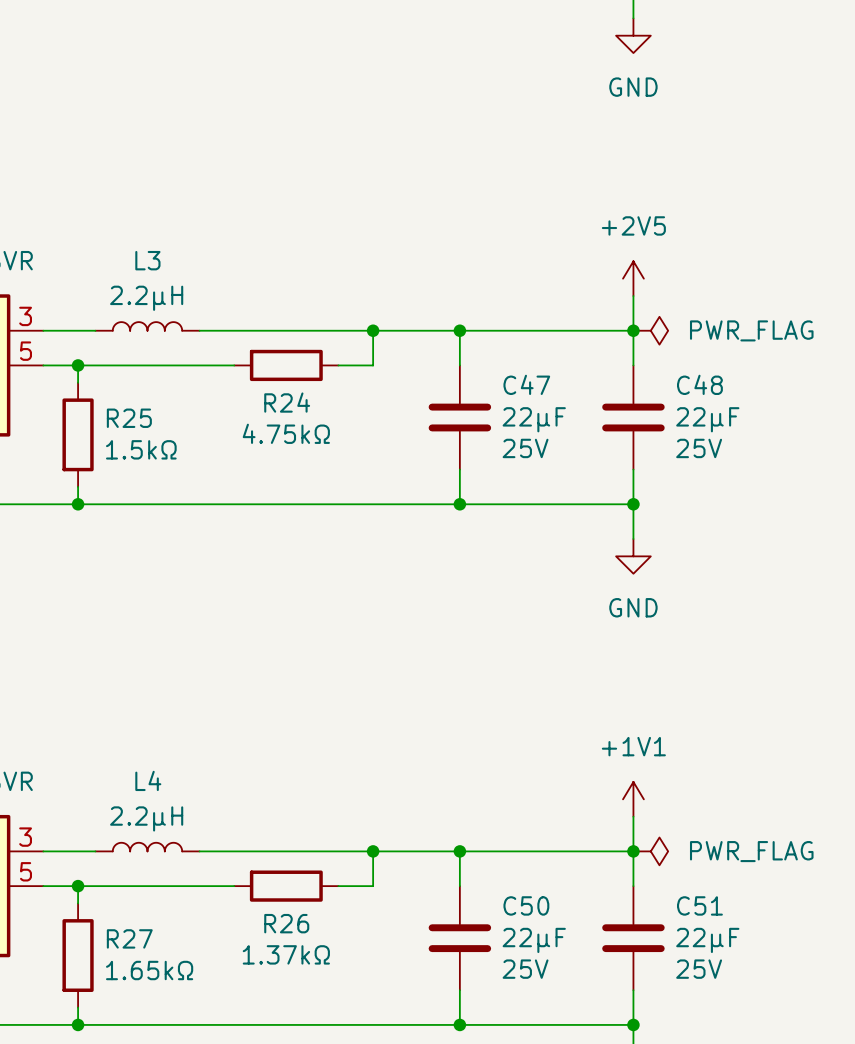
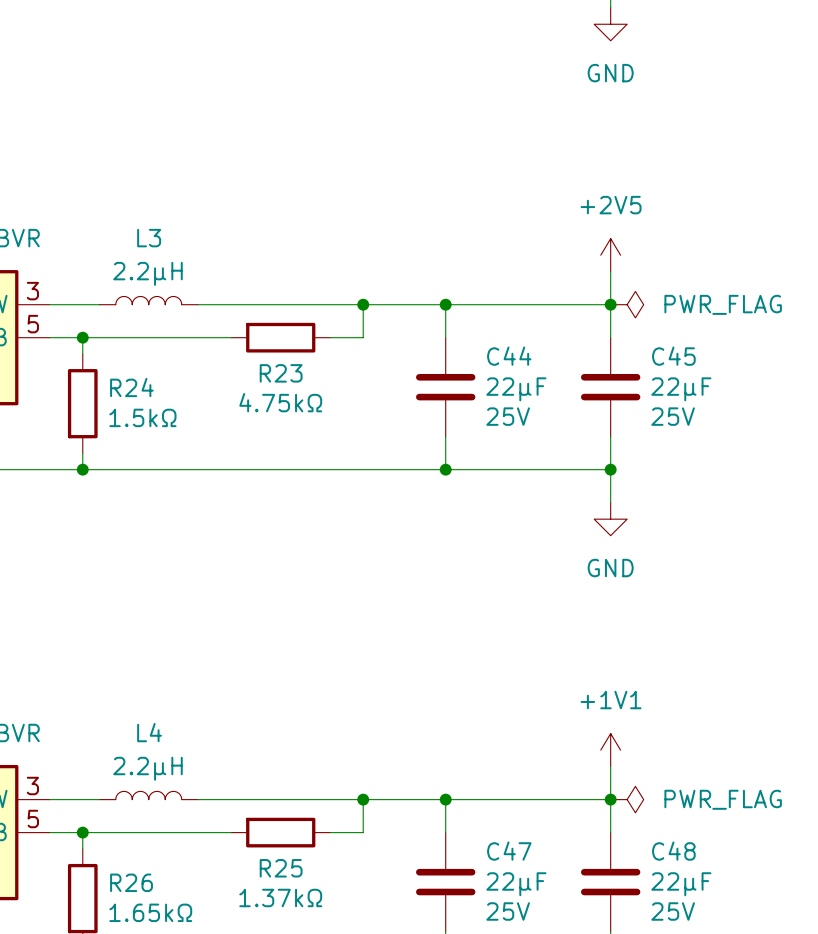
C47 name: C47 (526, 384) -> C44 (509, 356)
C48 name: C48 (699, 384) -> C45 (673, 356)
R24 name: R24 (287, 402) -> R23 (281, 373)
R25 name: R25 (129, 418) -> R24 (131, 387)
C50 name: C50 (526, 905) -> C47 (509, 851)
C51 name: C51 (699, 905) -> C48 (673, 851)
R26 name: R26 (286, 923) -> R25 (281, 868)
R27 name: R27 (129, 938) -> R26 (131, 882)

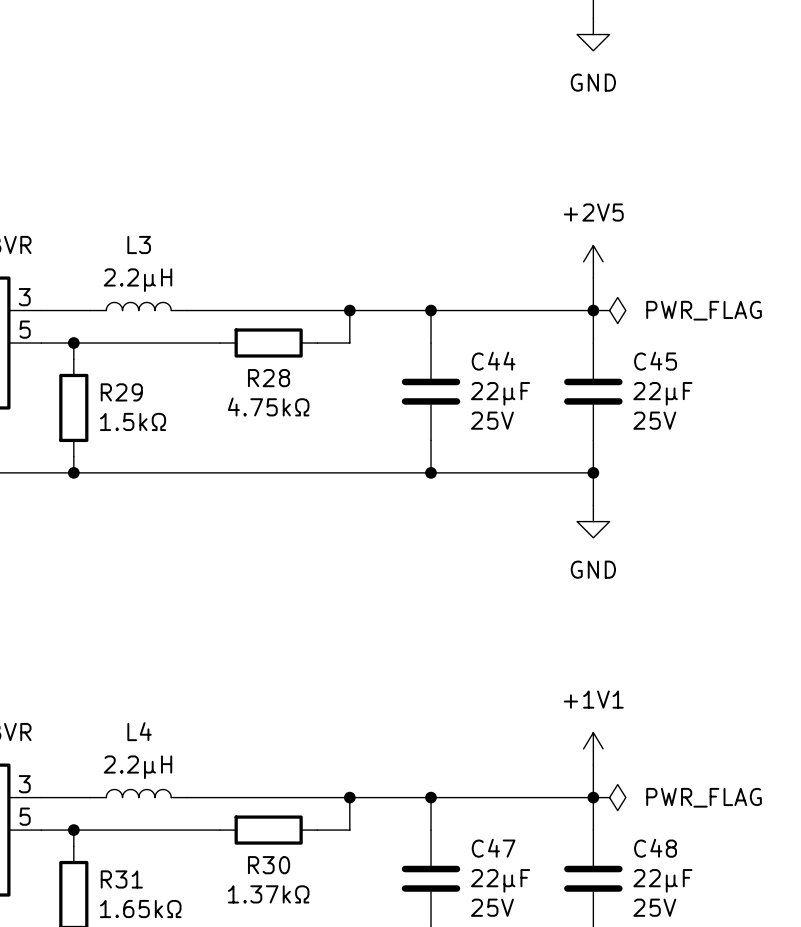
R23 name: R23 (281, 373) -> R28 (269, 378)
R24 name: R24 (131, 387) -> R29 (121, 392)
R25 name: R25 (281, 868) -> R30 (269, 865)
R26 name: R26 (131, 882) -> R31 (121, 879)

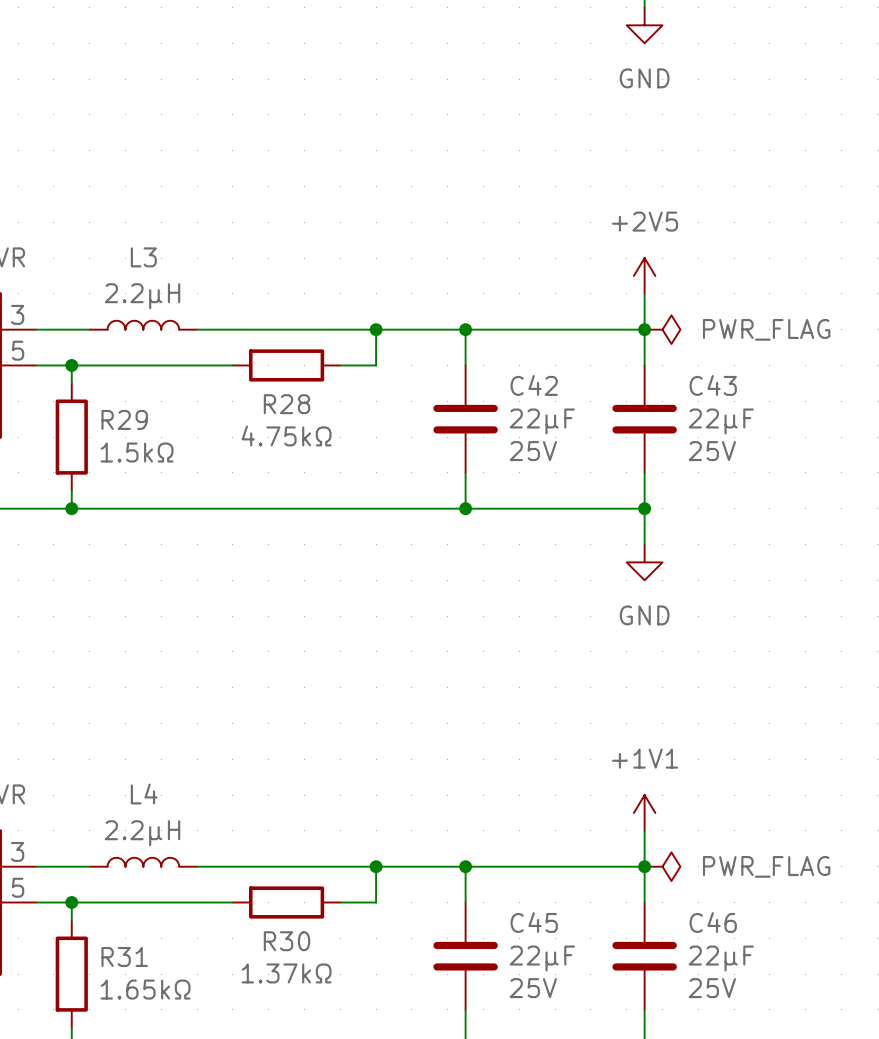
C44 name: C44 (493, 361) -> C42 (534, 385)
C45 name: C45 (655, 361) -> C43 (713, 385)
C47 name: C47 (493, 848) -> C45 (534, 922)
C48 name: C48 (655, 848) -> C46 (713, 922)

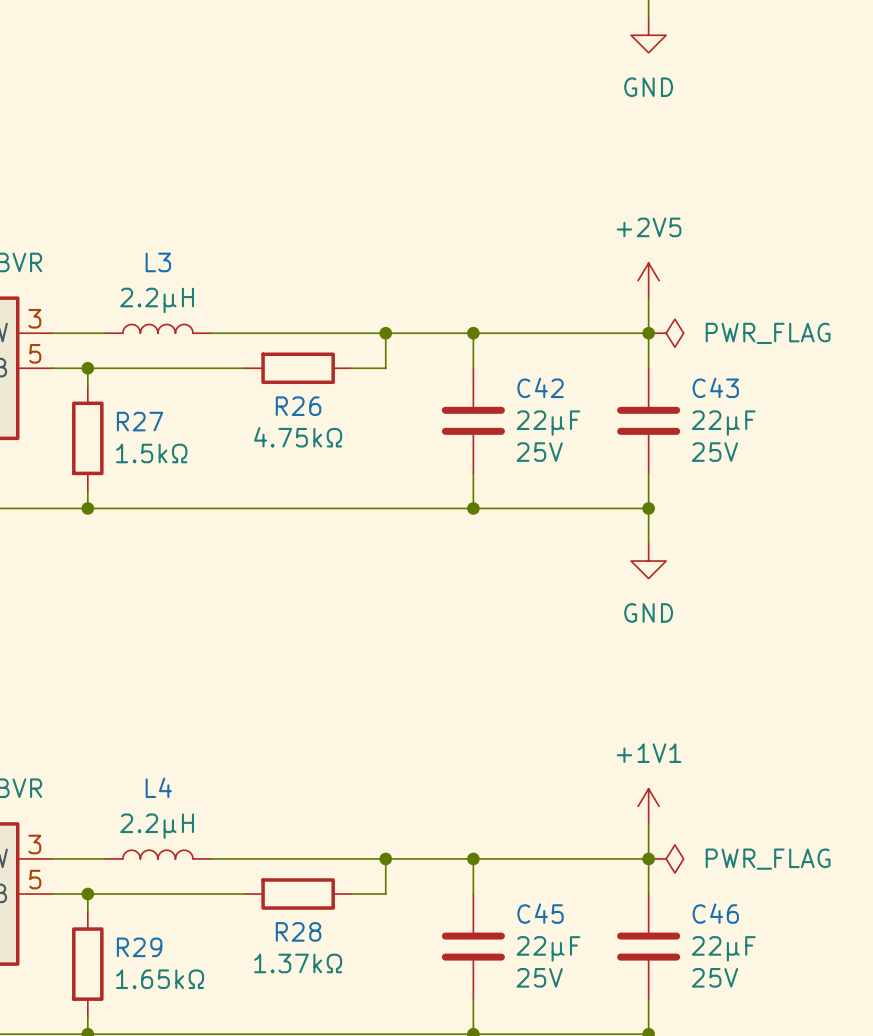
R28 name: R28 (287, 404) -> R26 (298, 406)
R29 name: R29 (124, 419) -> R27 (140, 421)
R30 name: R30 (287, 941) -> R28 (298, 931)
R31 name: R31 (124, 956) -> R29 (139, 947)

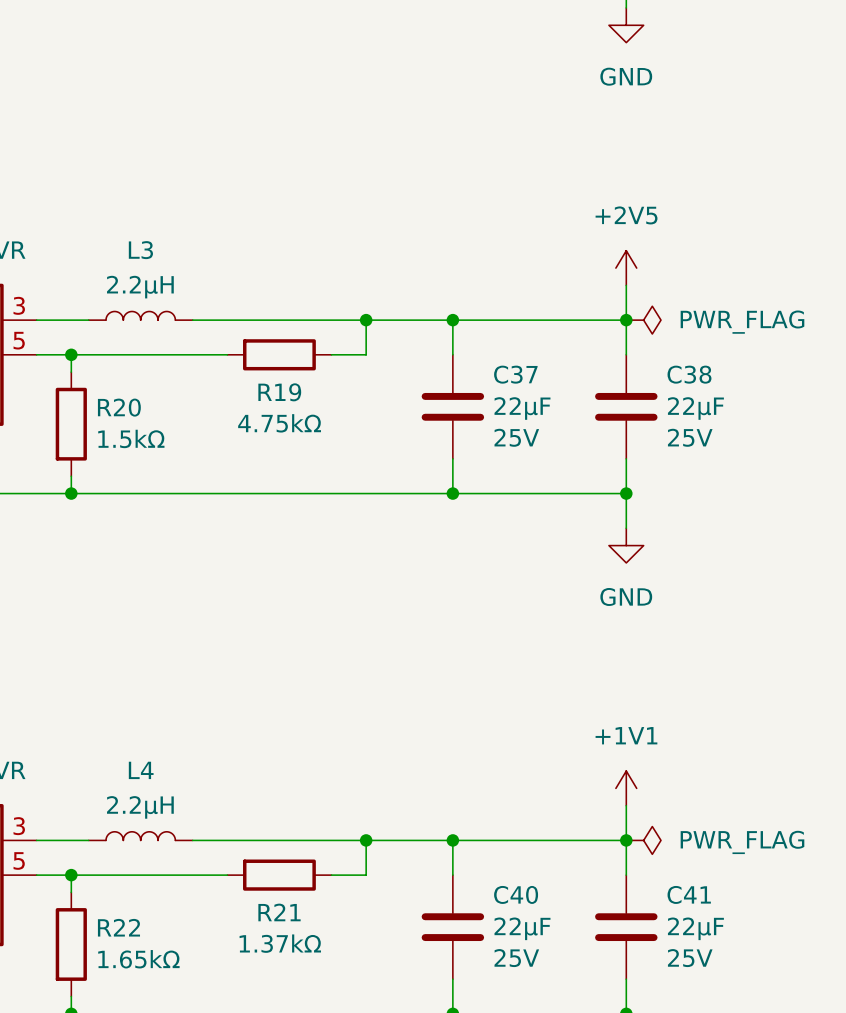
C42 name: C42 (540, 387) -> C37 (515, 374)
C43 name: C43 (715, 387) -> C38 (689, 374)
R26 name: R26 (298, 406) -> R19 (279, 392)
R27 name: R27 (140, 421) -> R20 (119, 407)
C45 name: C45 (540, 913) -> C40 (516, 894)
C46 name: C46 (715, 913) -> C41 (689, 894)
R28 name: R28 (298, 931) -> R21 (279, 912)
R29 name: R29 (139, 947) -> R22 (118, 927)

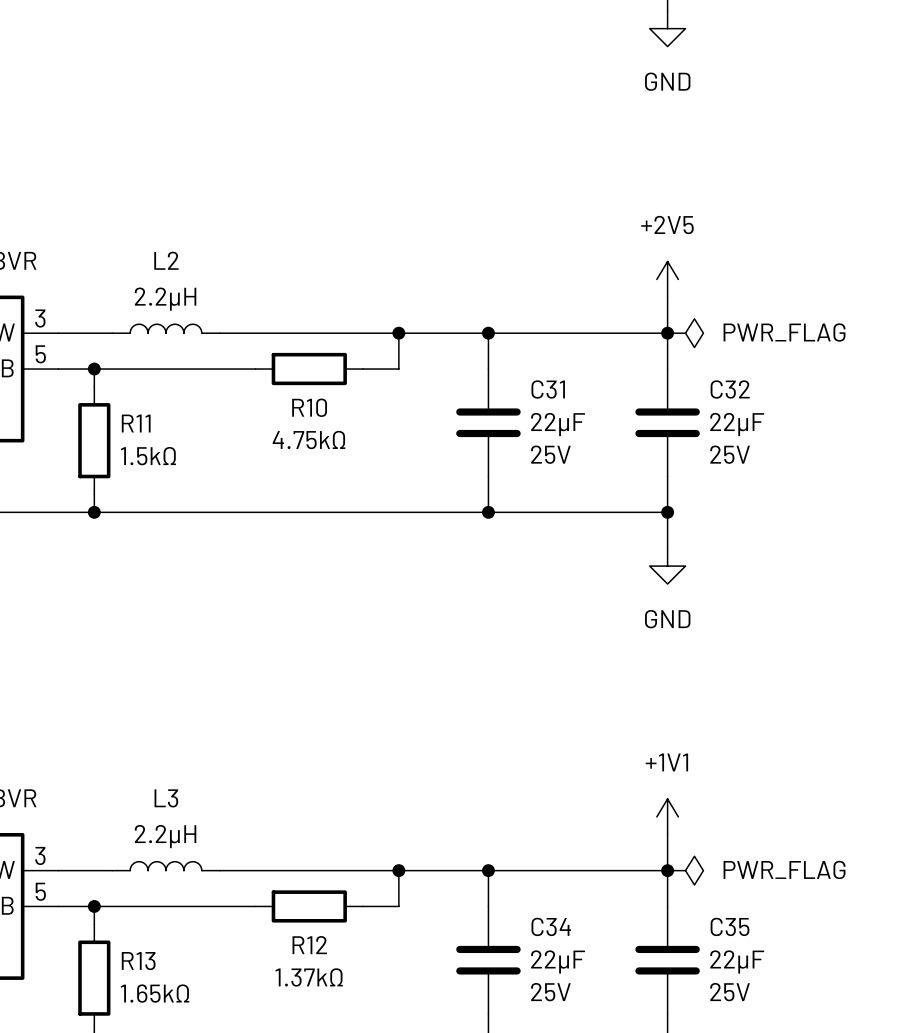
L3 name: L3 (140, 250) -> L2 (166, 260)
C37 name: C37 (515, 374) -> C31 (548, 389)
C38 name: C38 (689, 374) -> C32 (730, 389)
R19 name: R19 (279, 392) -> R10 (309, 407)
R20 name: R20 (119, 407) -> R11 (136, 423)
L4 name: L4 (141, 770) -> L3 (166, 798)
C40 name: C40 (516, 894) -> C34 (551, 926)
C41 name: C41 (689, 894) -> C35 (730, 926)
R21 name: R21 (279, 912) -> R12 (309, 945)
R22 name: R22 (118, 927) -> R13 (138, 961)

